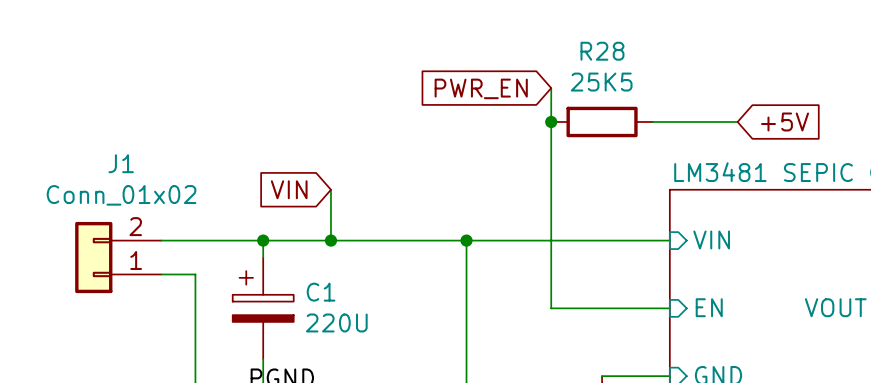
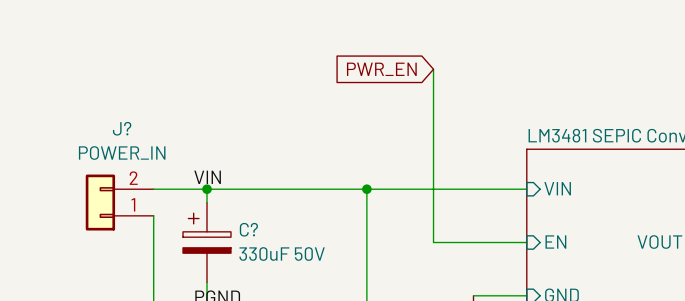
junction: (551, 121) -> none
R28: 25K5 (602, 121) -> none
wire: (652, 121) (737, 121) -> none
global label: +5V (785, 121) -> none
global label: VIN (289, 189) -> none
wire: (330, 189) (330, 240) -> none
label: none -> VIN (207, 177)
junction: (330, 240) -> none
J1: Conn_01x02 (118, 257) -> none
J?: none -> POWER_IN (119, 202)
C1 name: C1 (321, 292) -> C? (248, 229)
C1 value: 220U (336, 322) -> 330uF 50V (282, 254)

